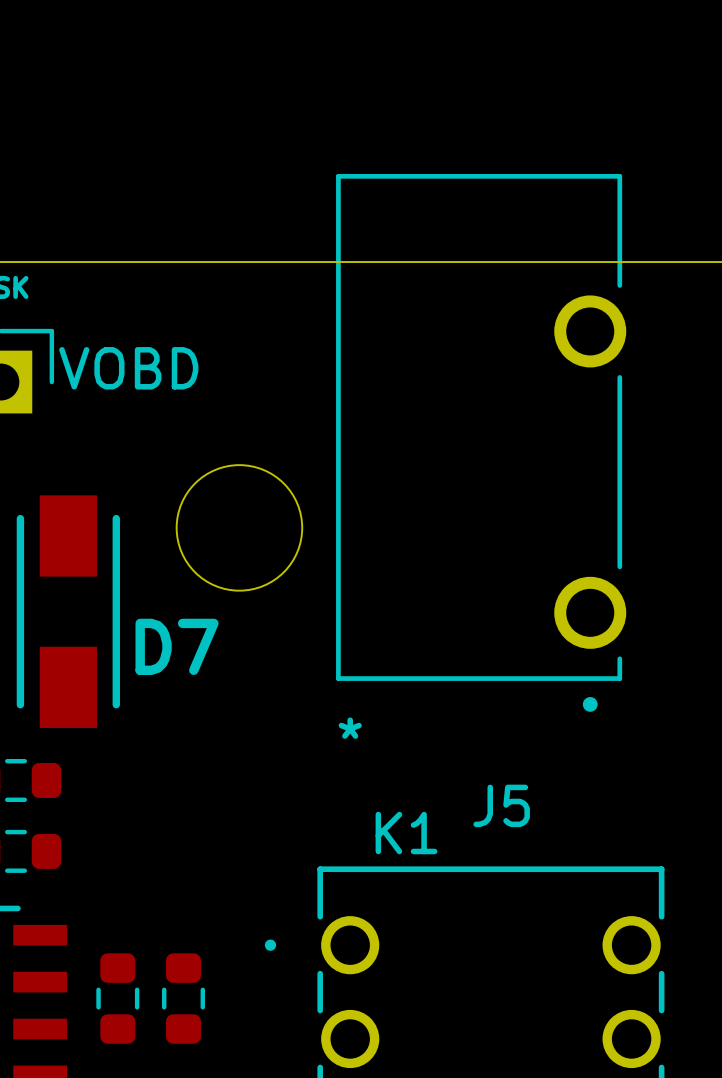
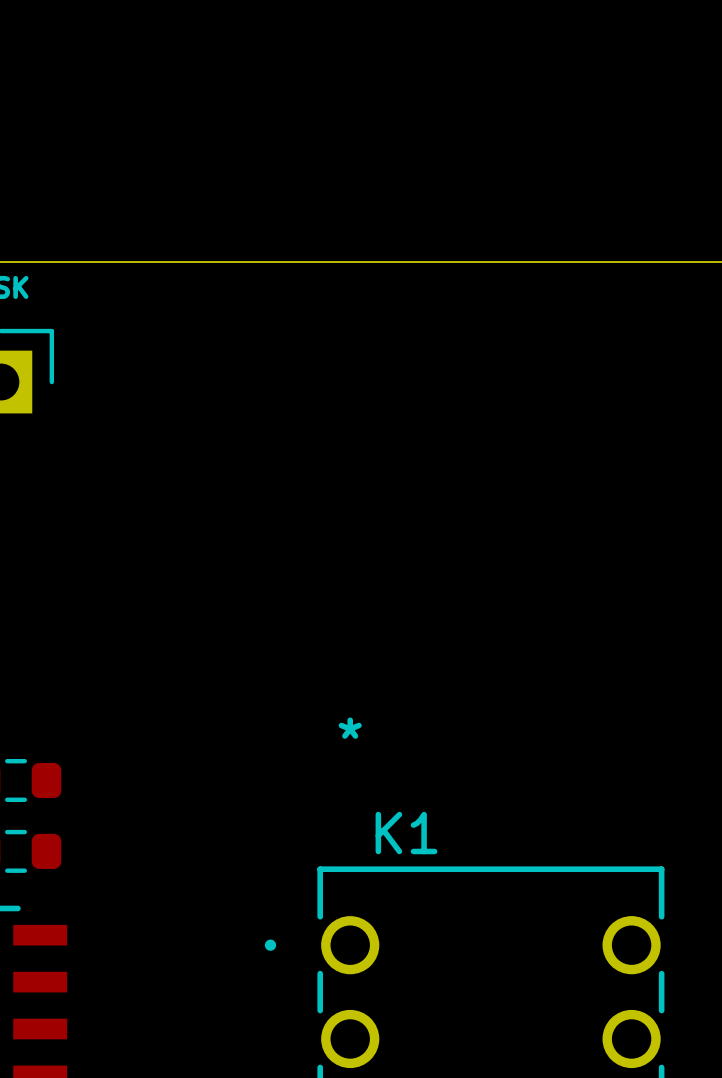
text: VOBD (128, 368) -> none
J5: (481, 442) -> none
round board edge: [175, 464, 304, 592] -> none
D7: (68, 611) -> none
part: (117, 998) -> none
part: (183, 998) -> none

